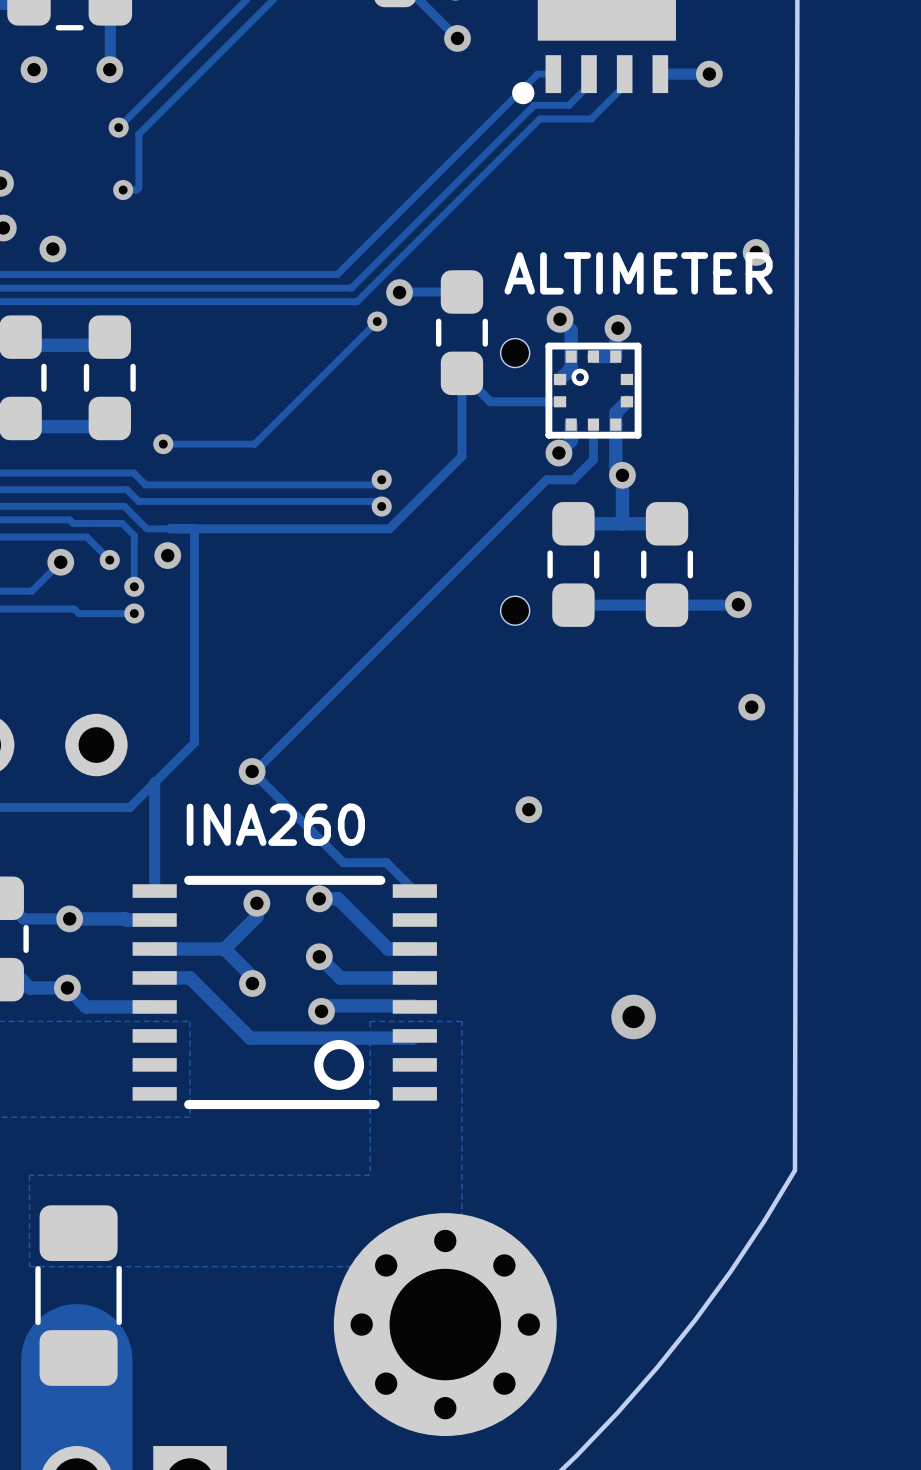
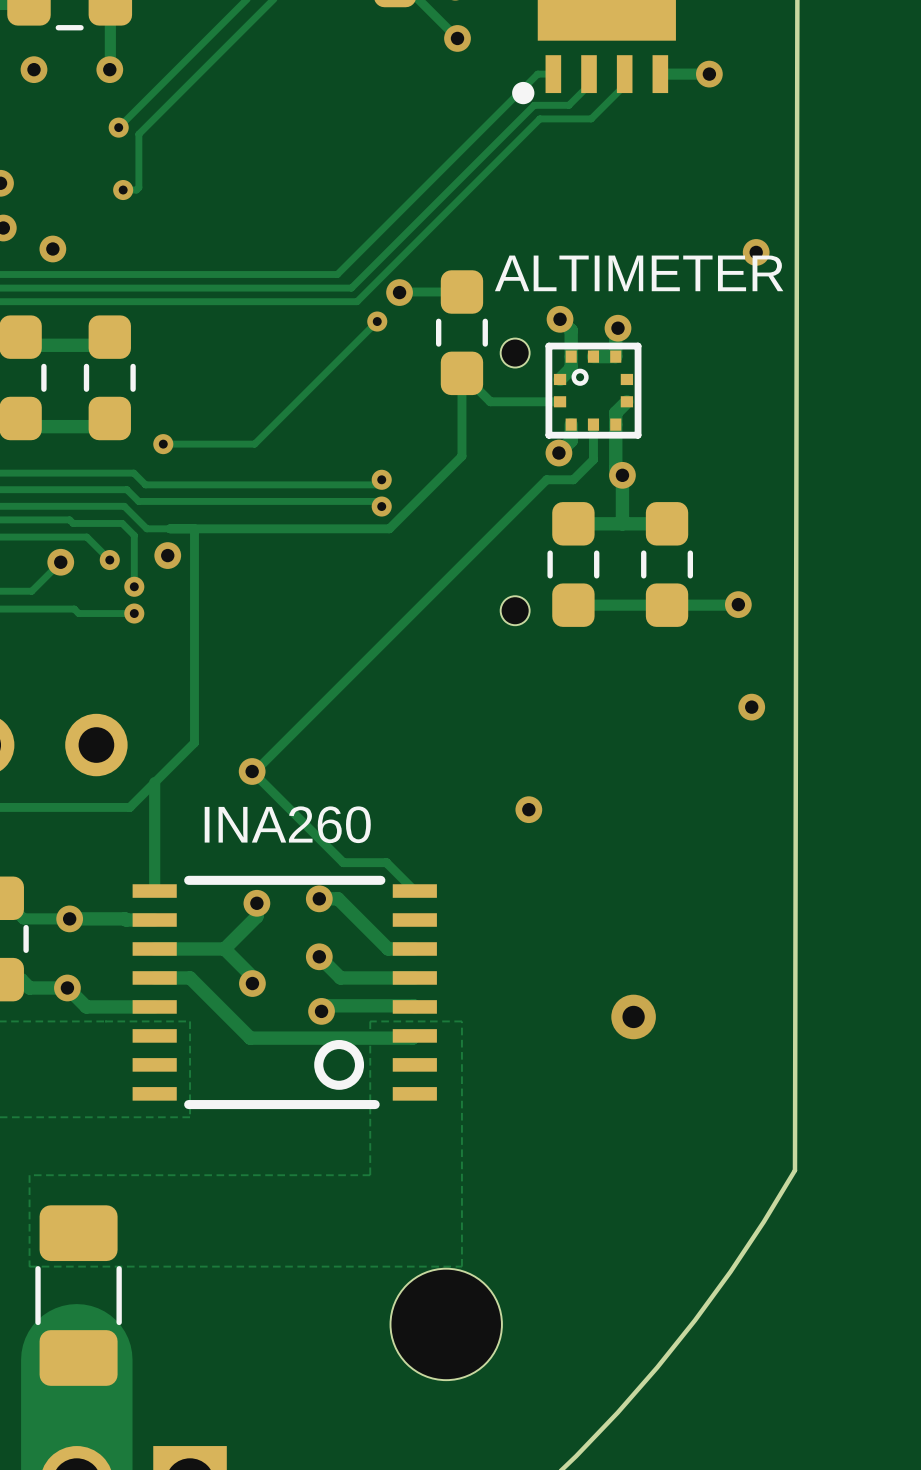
part footprint: [333, 1213, 557, 1437] -> [390, 1268, 502, 1381]

